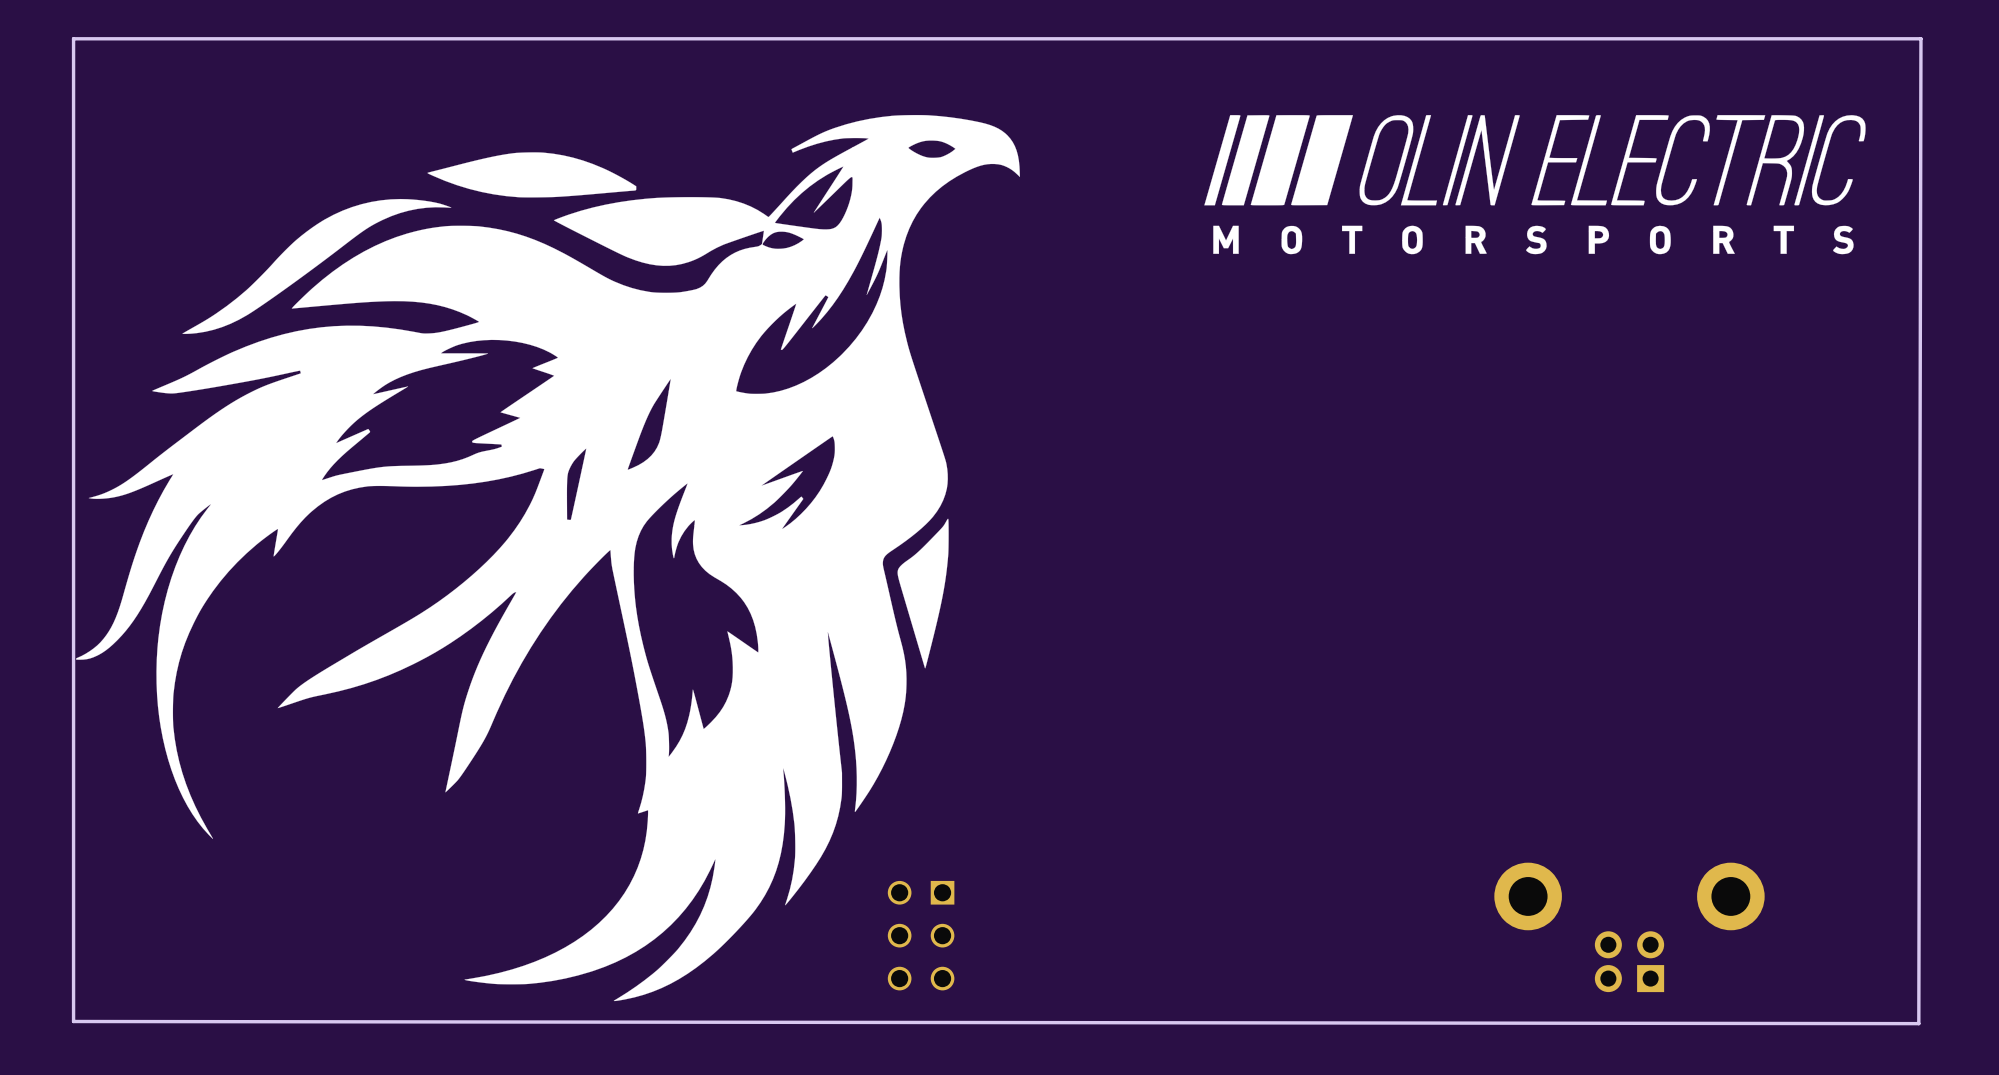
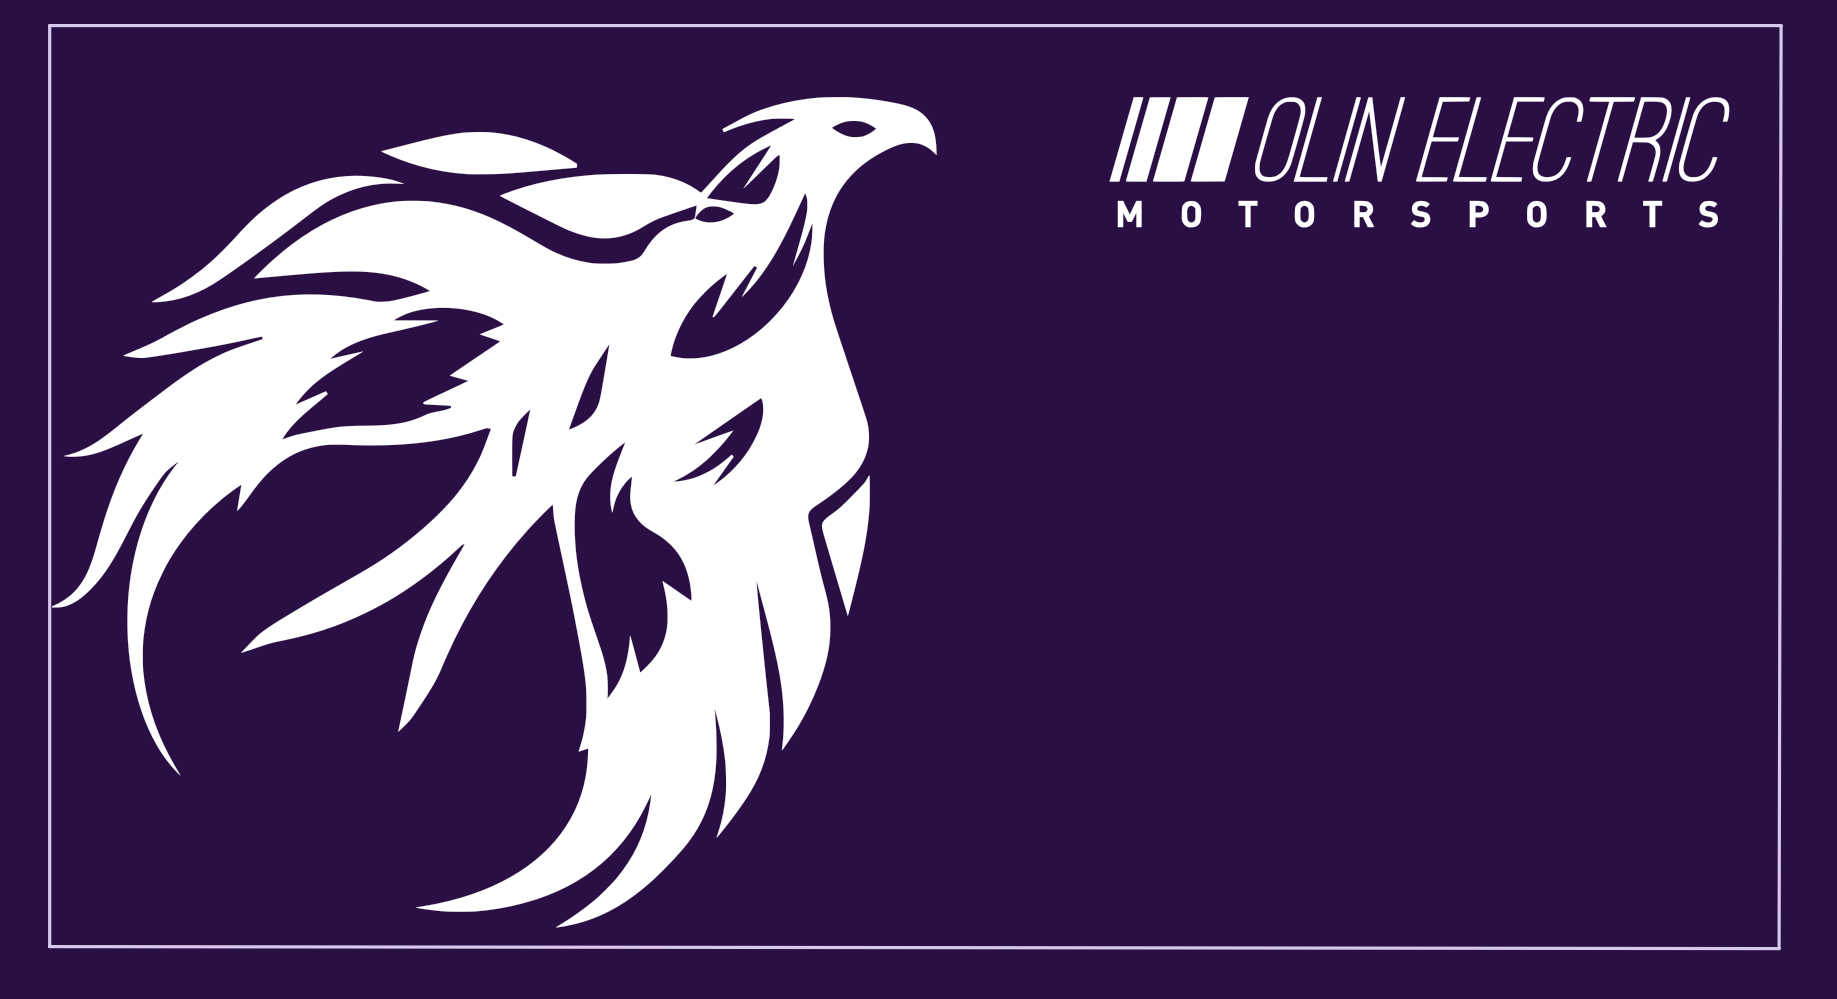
part: (1629, 927) -> none
part: (921, 935) -> none

